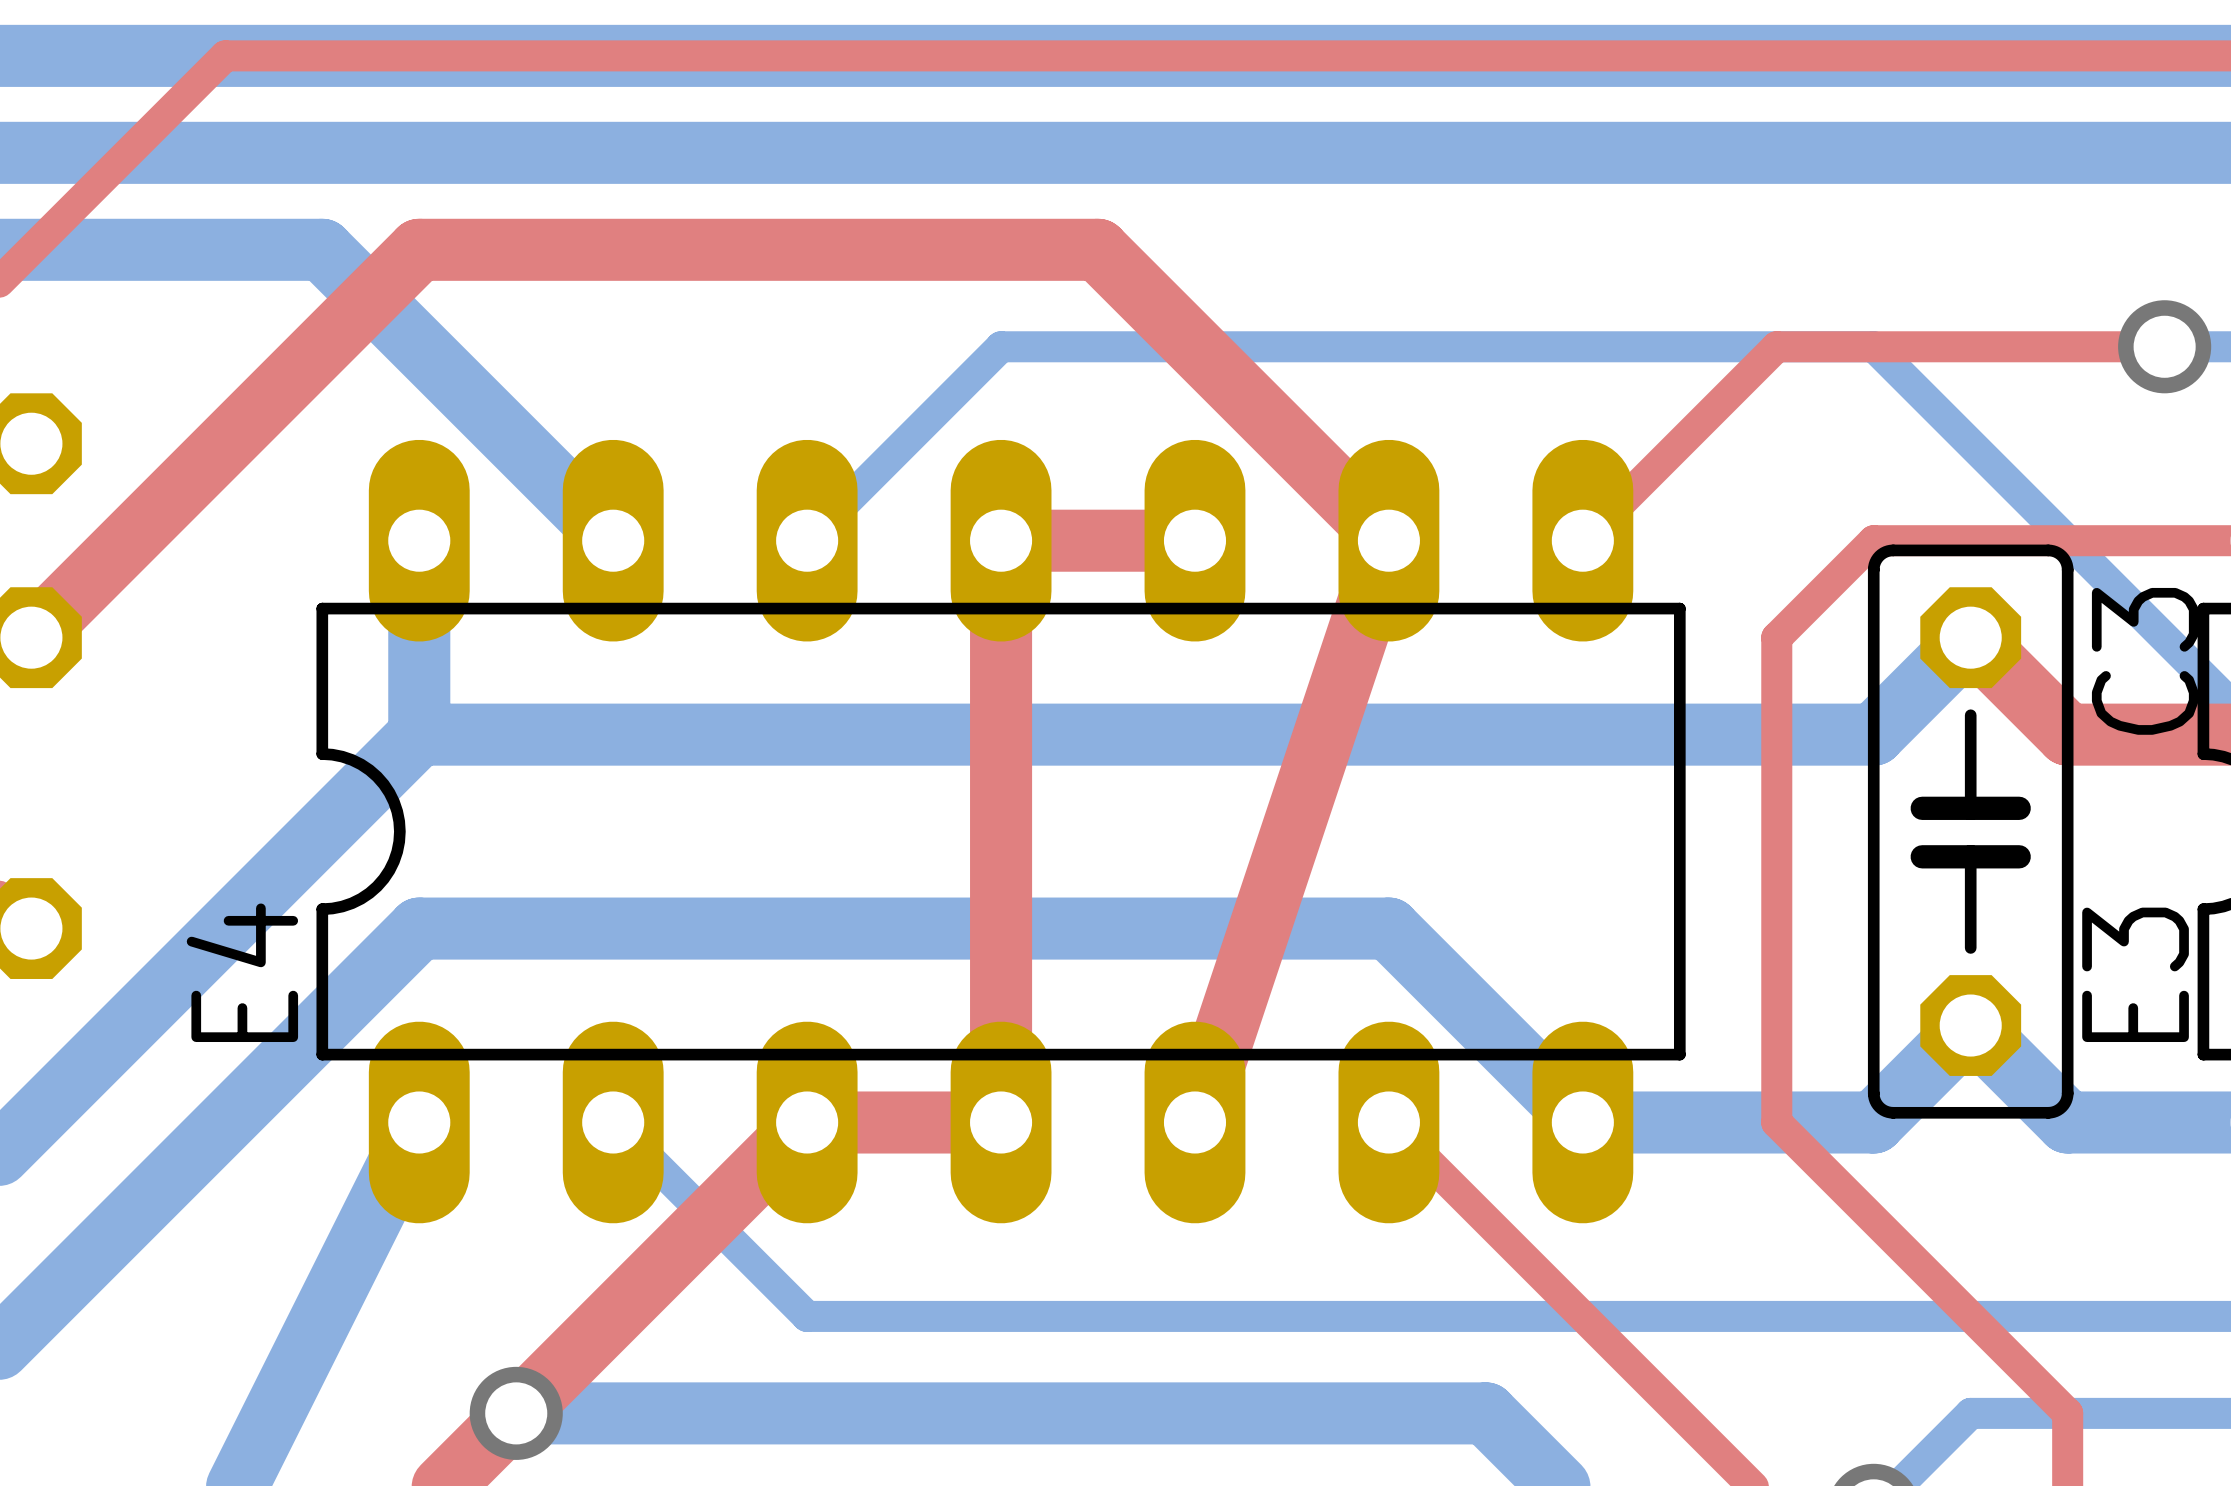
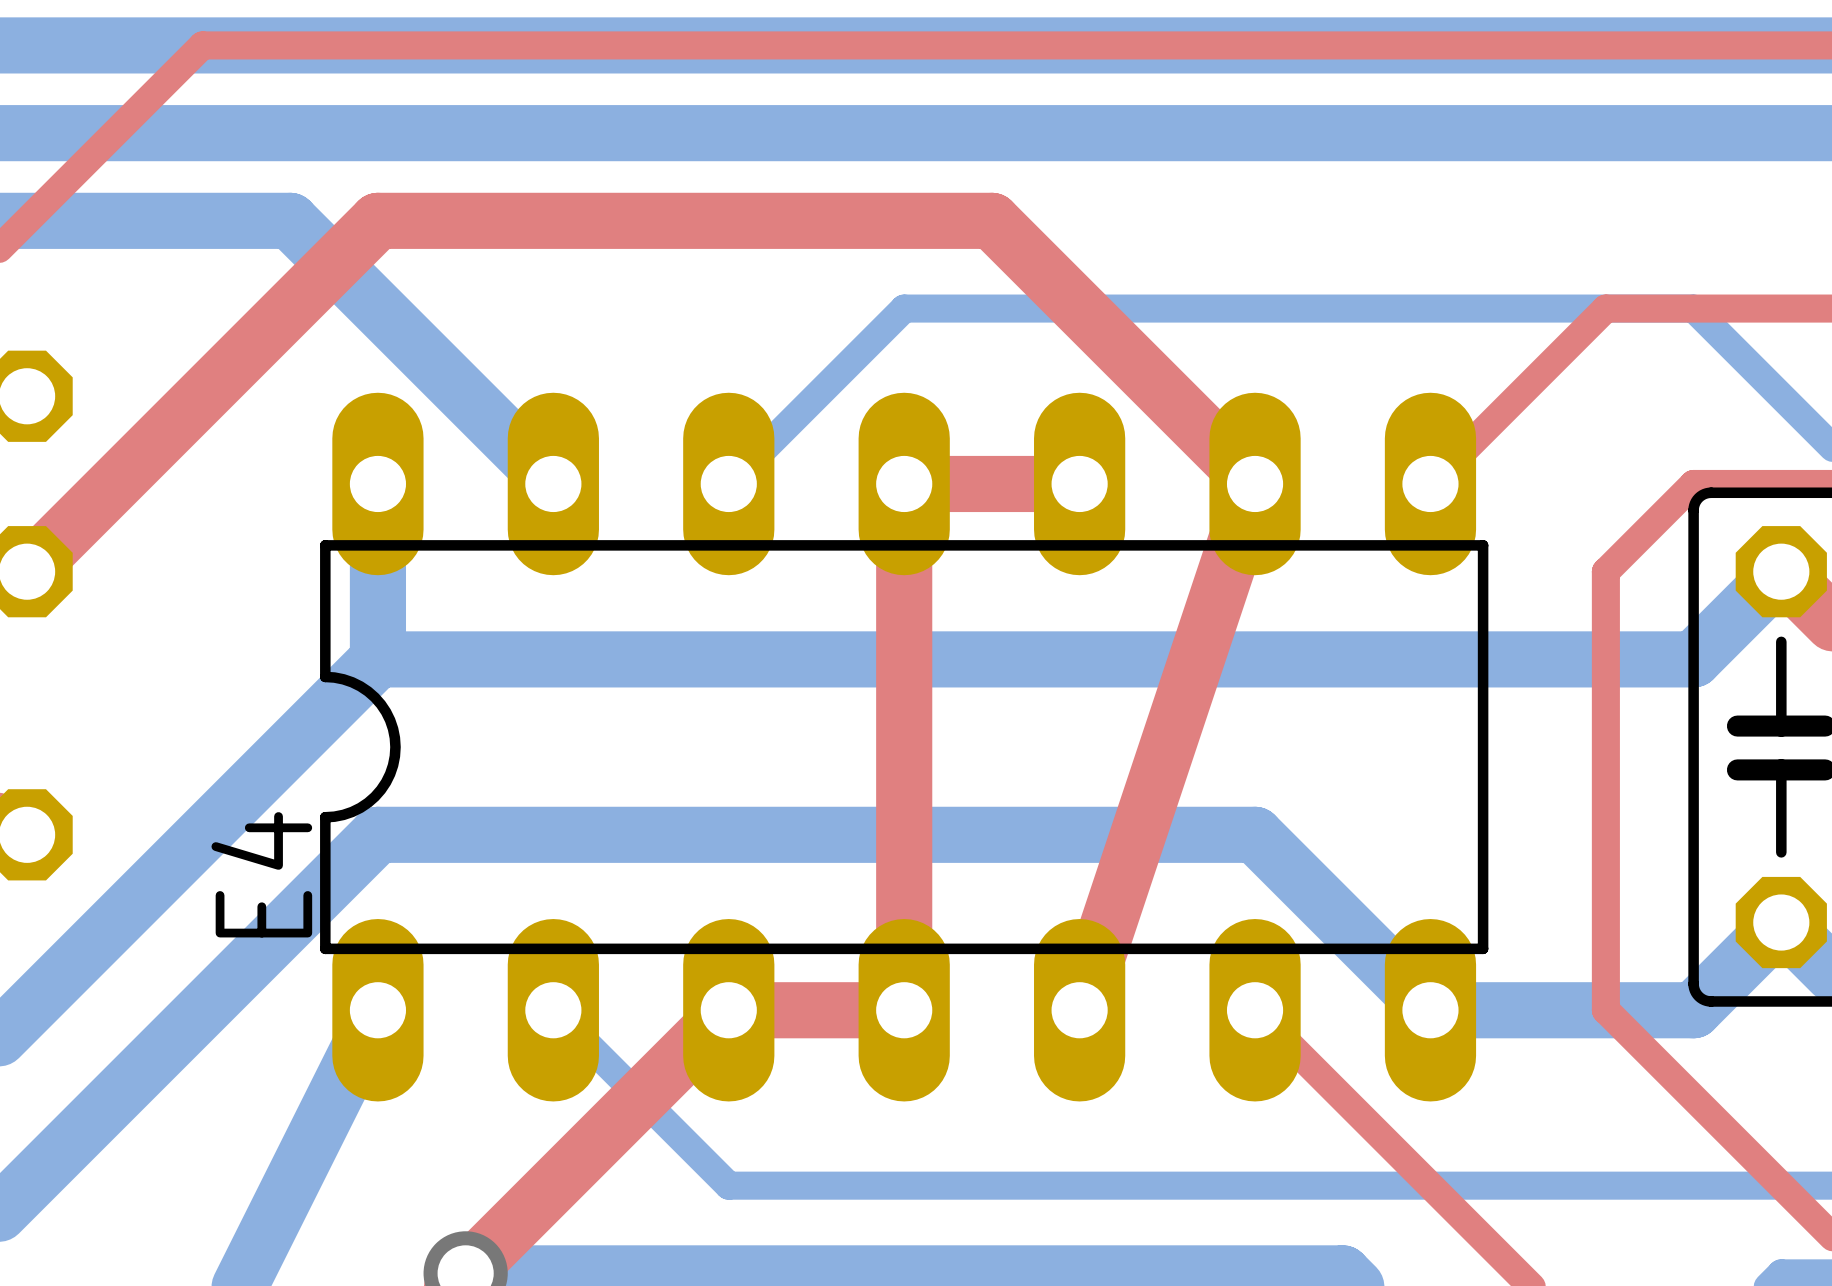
E4 footprint: [316, 439, 1686, 1224] -> [320, 392, 1489, 1102]
E4 name position: E4 (242, 972) -> E4 (261, 874)

